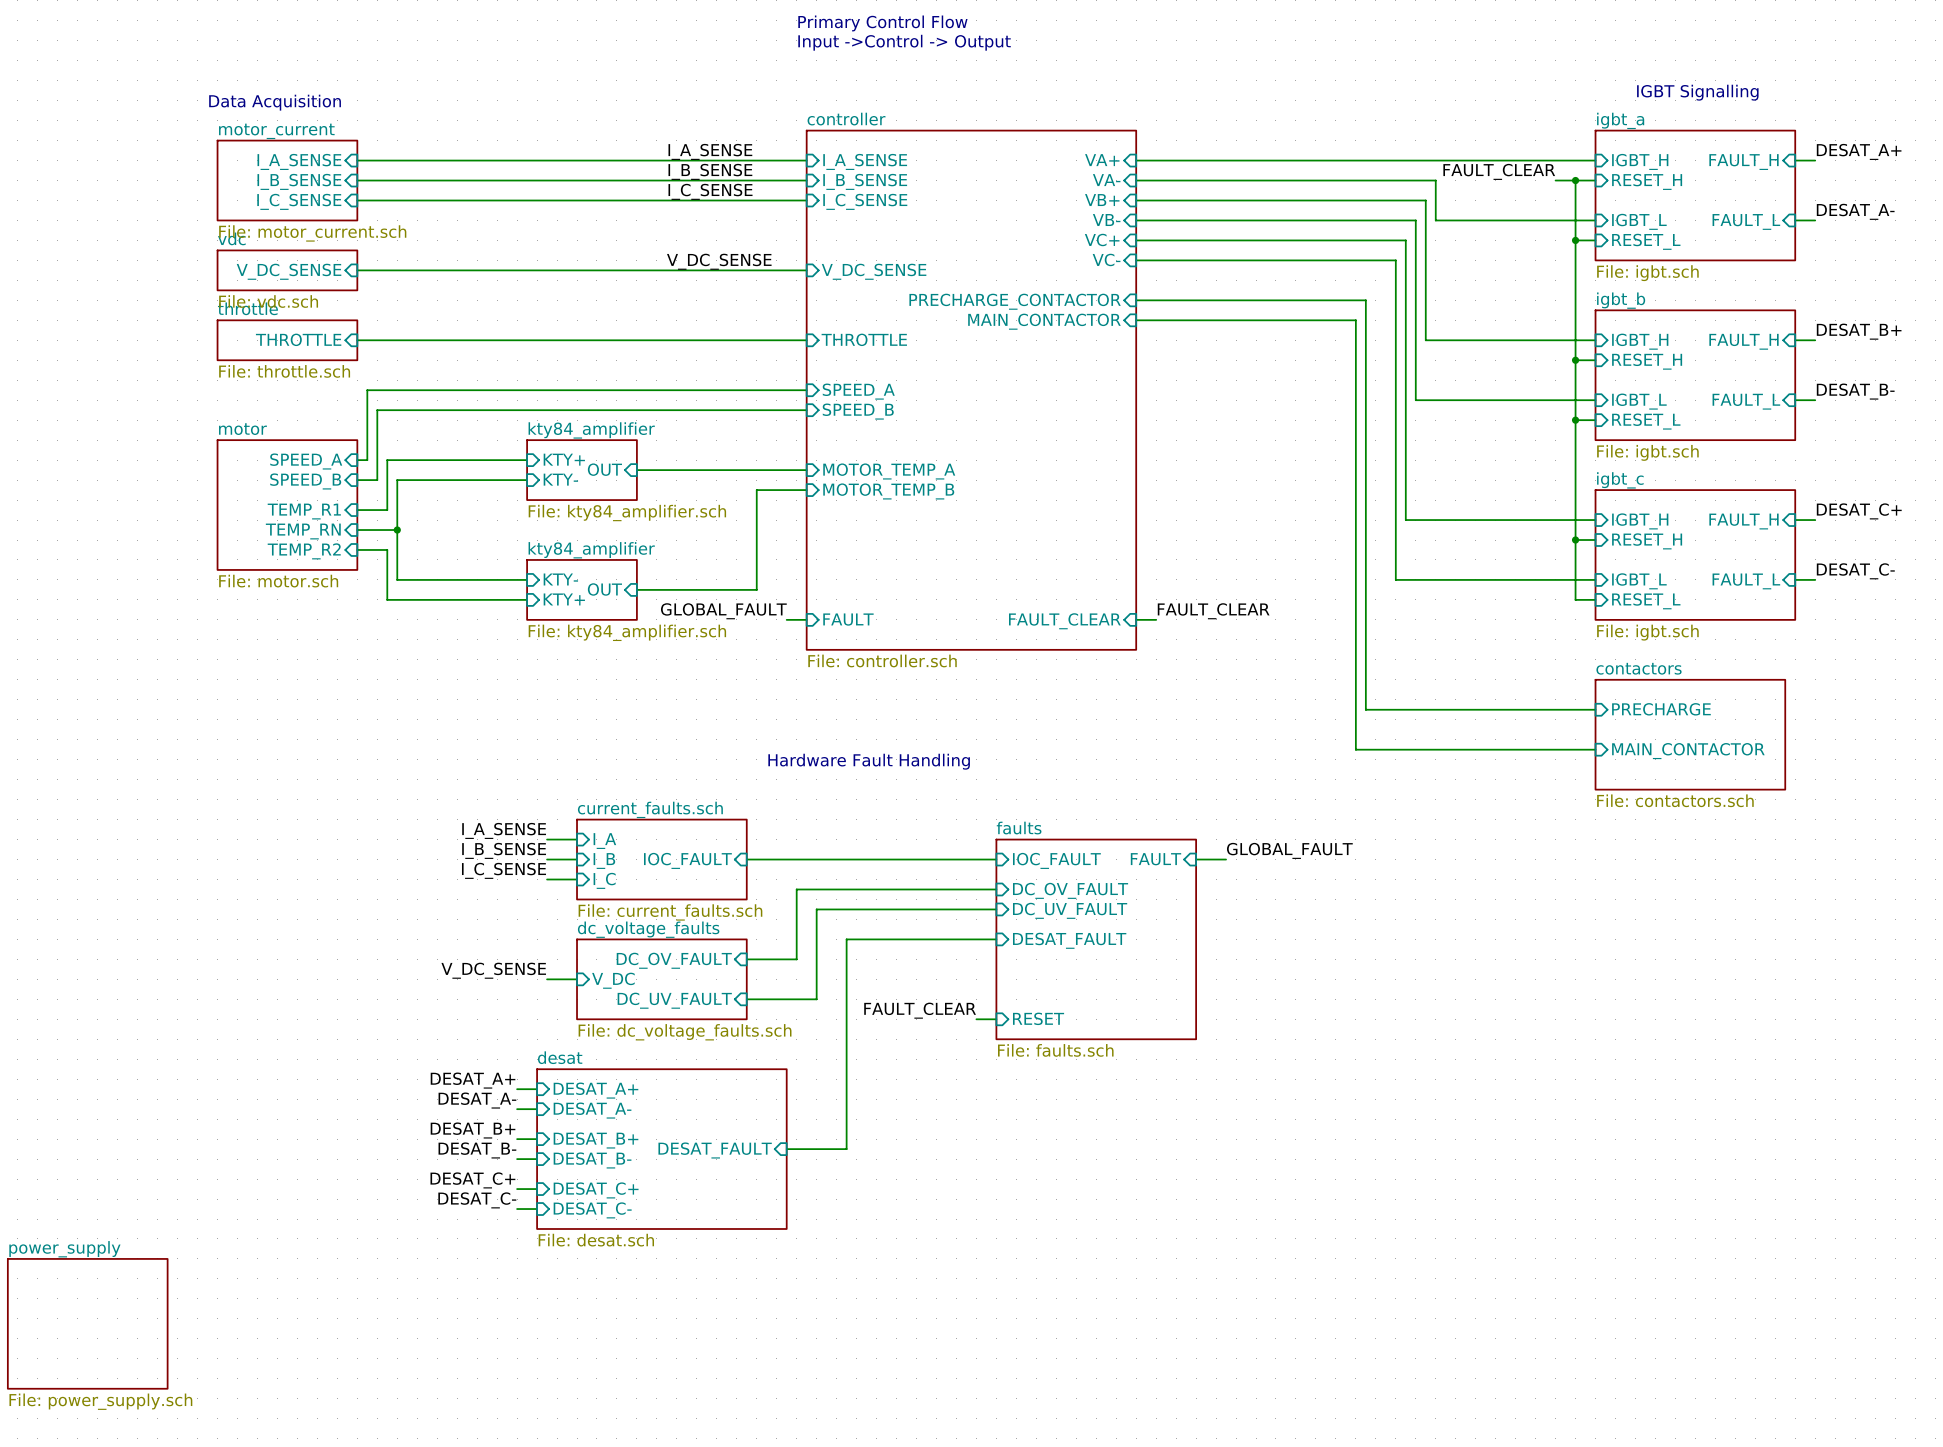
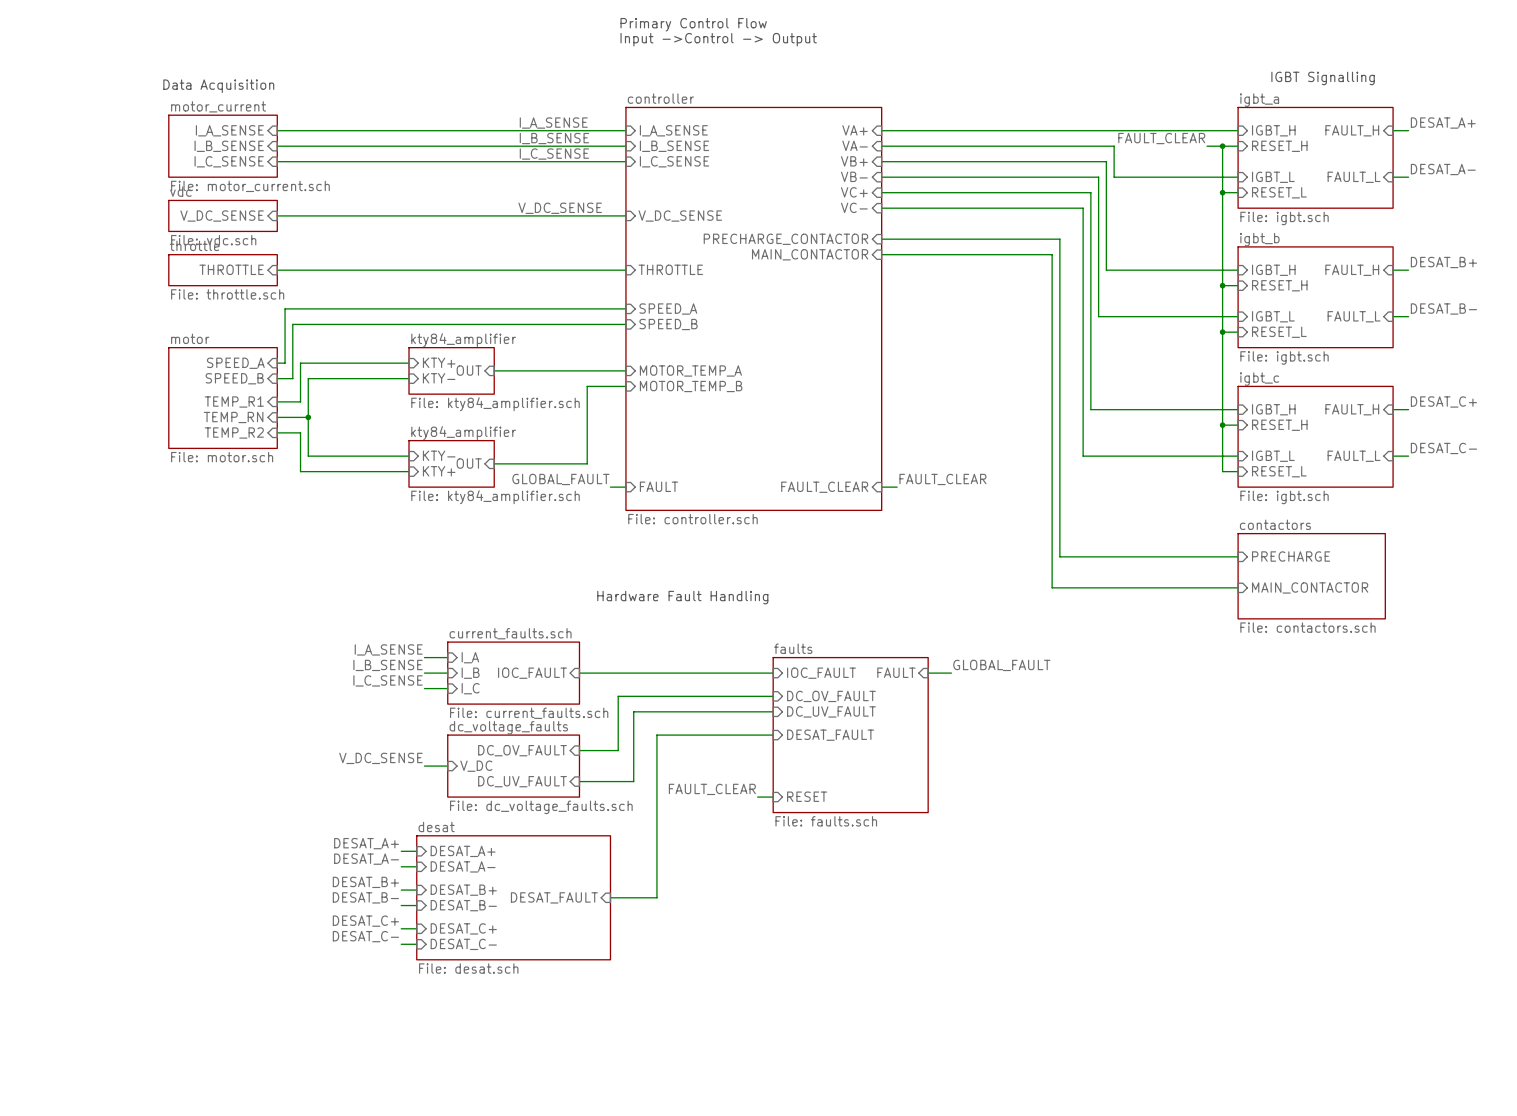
sheet power_supply: File: power_supply.sch (87, 1323) -> none

